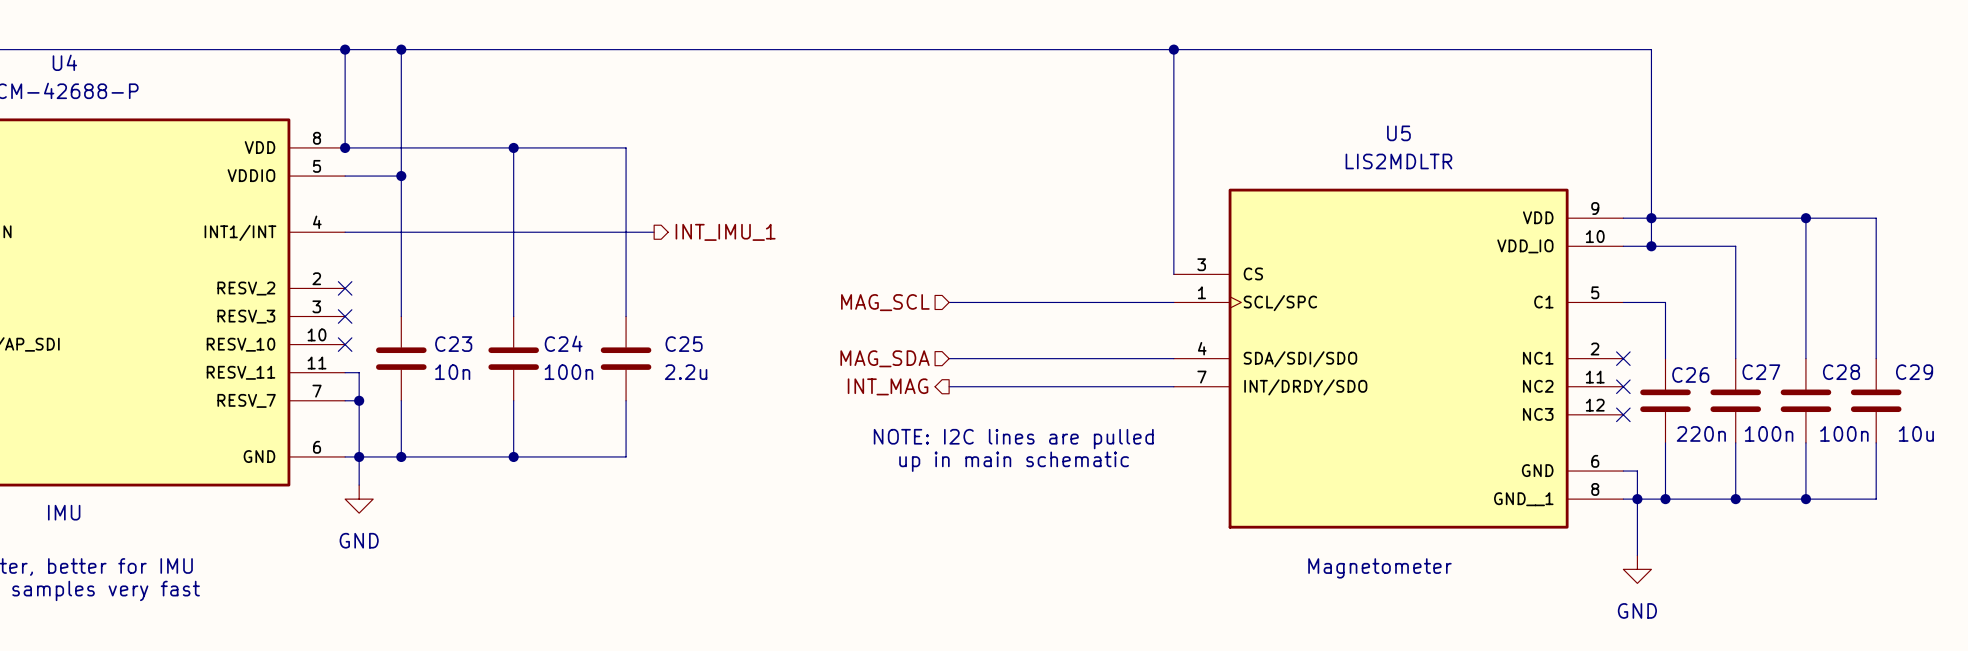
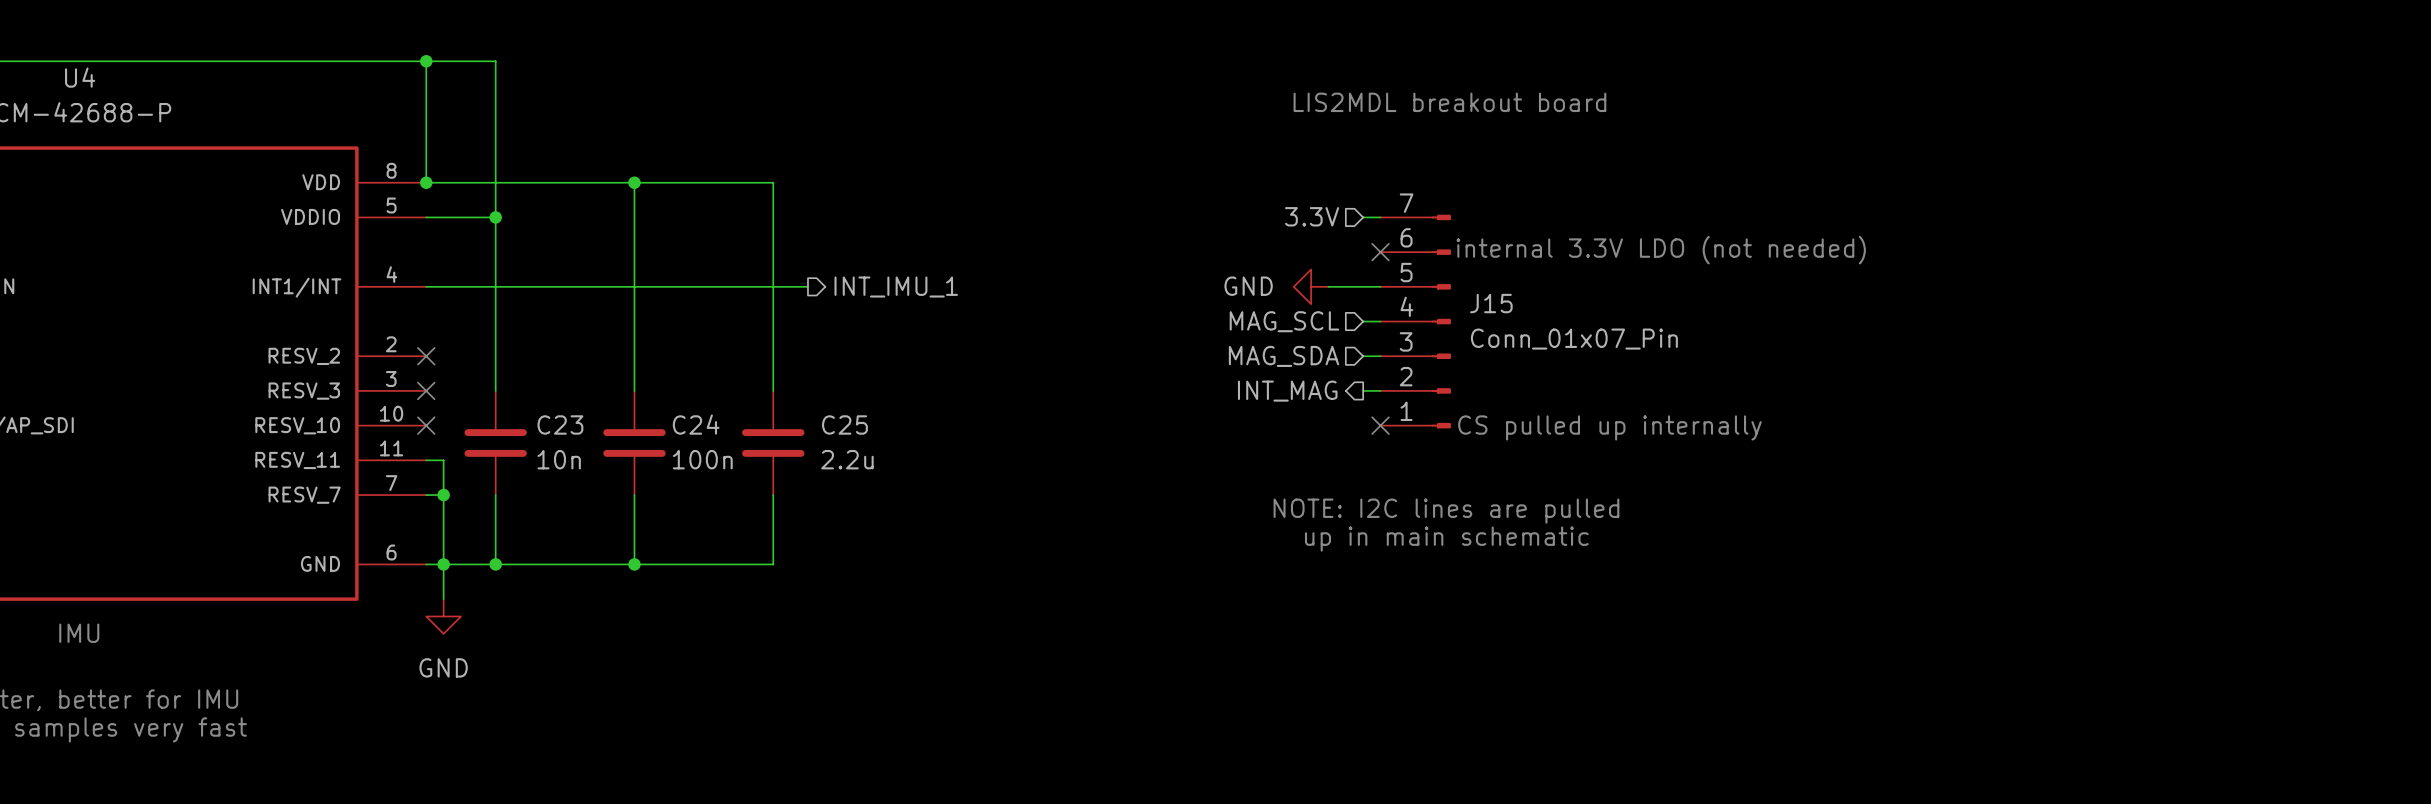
wire: (401, 49) (1651, 49) (1651, 246) -> none
junction: (401, 49) -> none
wire: (1173, 49) (1173, 274) -> none
junction: (1173, 49) -> none
text: none -> LIS2MDL breakout board (1449, 102)
hierarchical label: none -> 3.3V (1312, 216)
wire: none -> (1363, 217) (1380, 217)
text: none -> internal 3.3V LDO (not needed) (1661, 250)
no-connect mark: none -> (1380, 252)
wire: (1623, 218) (1876, 218) (1876, 358) -> none
junction: (1651, 218) -> none
wire: (1805, 218) (1805, 358) -> none
junction: (1805, 218) -> none
power symbol: none -> GND (1311, 286)
wire: none -> (1328, 286) (1380, 286)
wire: (1623, 246) (1735, 246) (1735, 358) -> none
junction: (1651, 246) -> none
wire: none -> (1363, 321) (1380, 321)
J15: none -> Conn_01x07_Pin (1415, 321)
wire: none -> (1363, 356) (1380, 356)
hierarchical label position: MAG_SCL (885, 302) -> MAG_SCL (1284, 321)
wire: (949, 302) (1173, 302) -> none
wire: (1623, 302) (1665, 302) (1665, 358) -> none
wire: none -> (1363, 390) (1380, 390)
no-connect mark: none -> (1380, 425)
text: none -> CS pulled up internally (1609, 427)
hierarchical label position: MAG_SDA (885, 358) -> MAG_SDA (1284, 356)
wire: (949, 358) (1173, 358) -> none
U5: LIS2MDLTR (1398, 358) -> none
no-connect mark: (1623, 358) -> none
hierarchical label position: INT_MAG (888, 386) -> INT_MAG (1287, 391)
wire: (949, 386) (1173, 386) -> none
no-connect mark: (1623, 386) -> none
C26: 220n (1665, 400) -> none
C27: 100n (1735, 400) -> none
C28: 100n (1805, 400) -> none
C29: 10u (1876, 400) -> none
no-connect mark: (1623, 414) -> none
text position: NOTE: I2C lines are pulled (1013, 439) -> NOTE: I2C lines are pulled (1446, 511)
wire: (1665, 442) (1665, 499) -> none
wire: (1735, 442) (1735, 499) -> none
wire: (1805, 442) (1805, 499) -> none
wire: (1876, 442) (1876, 499) (1623, 499) -> none
text position: up in main schematic (1014, 461) -> up in main schematic (1446, 539)
wire: (1623, 471) (1637, 471) (1637, 555) -> none
junction: (1637, 499) -> none
junction: (1665, 499) -> none
junction: (1735, 499) -> none
junction: (1805, 499) -> none
text: Magnetometer (1379, 568) -> none
power symbol: GND (1637, 569) -> none

